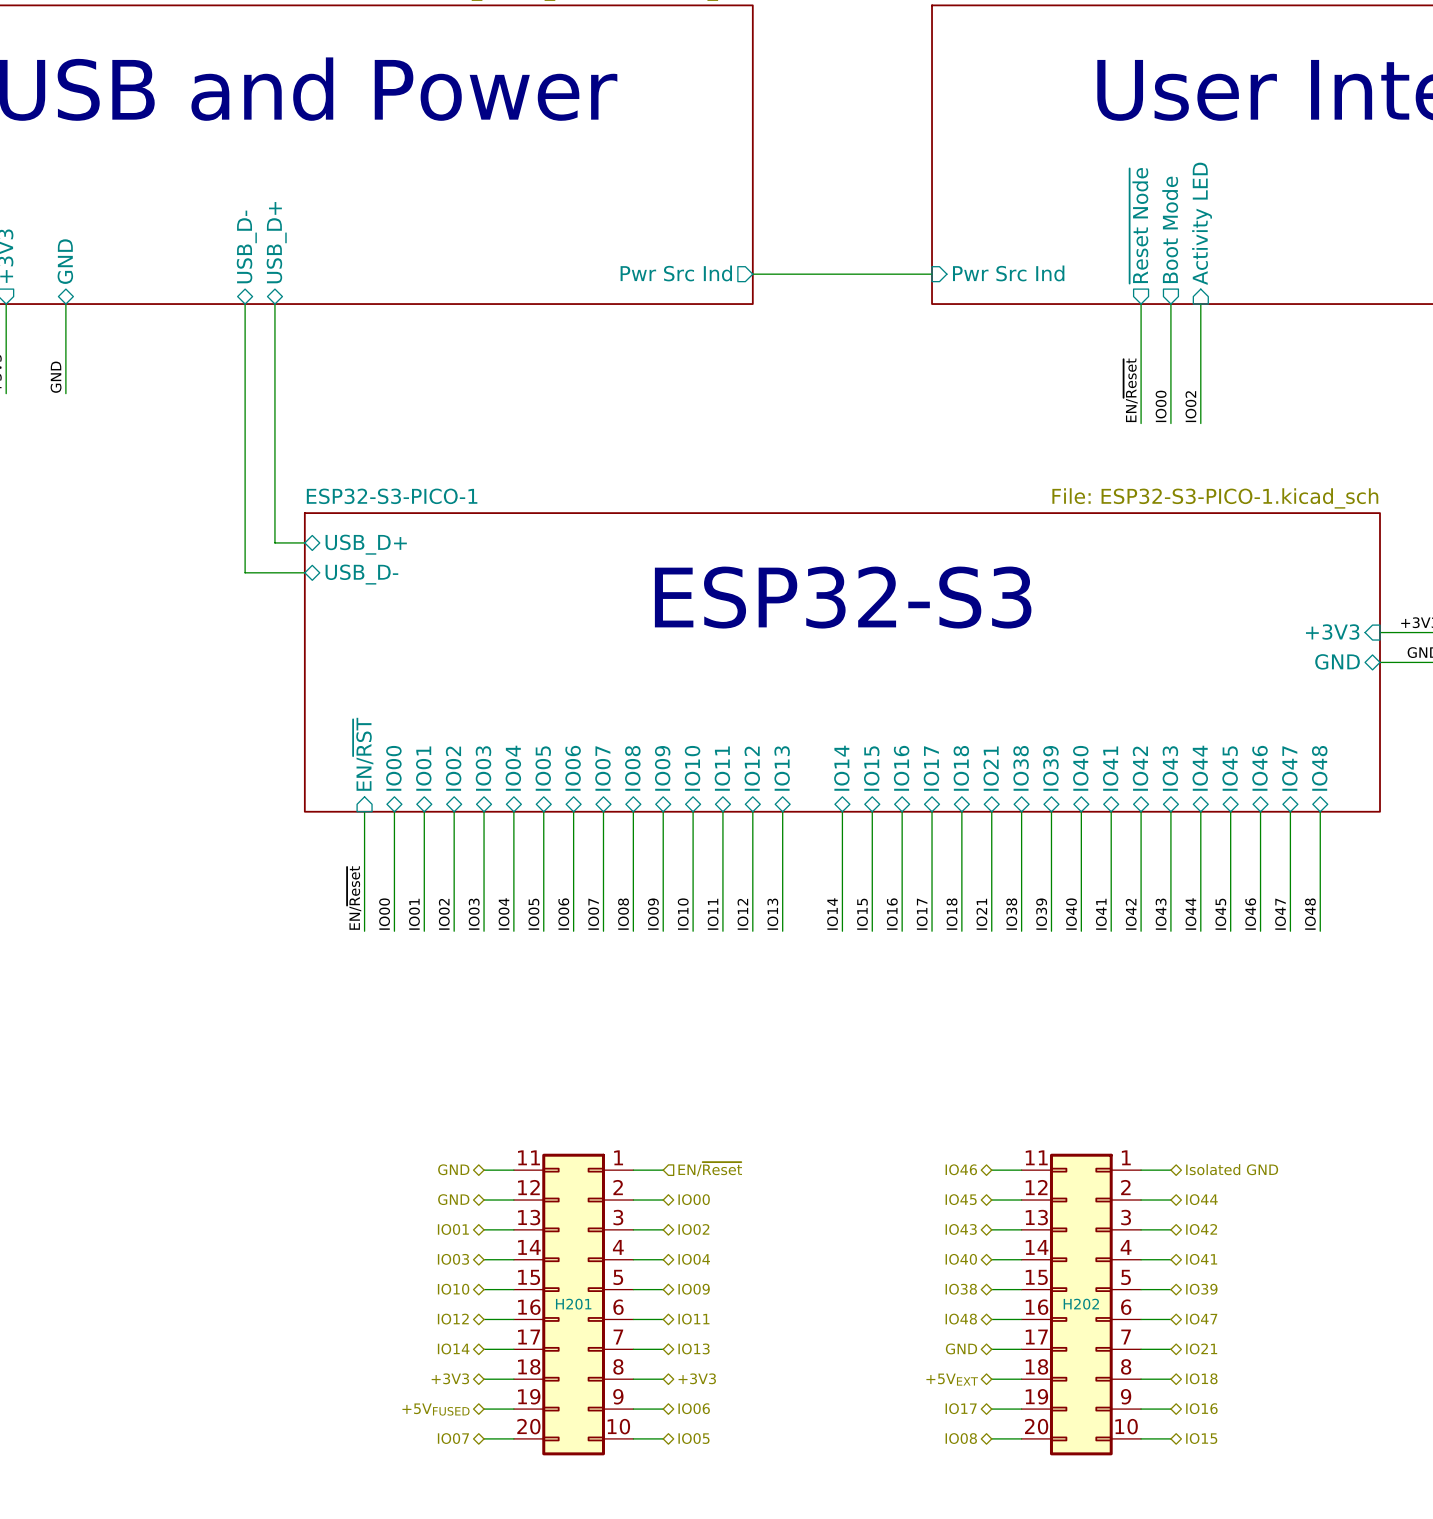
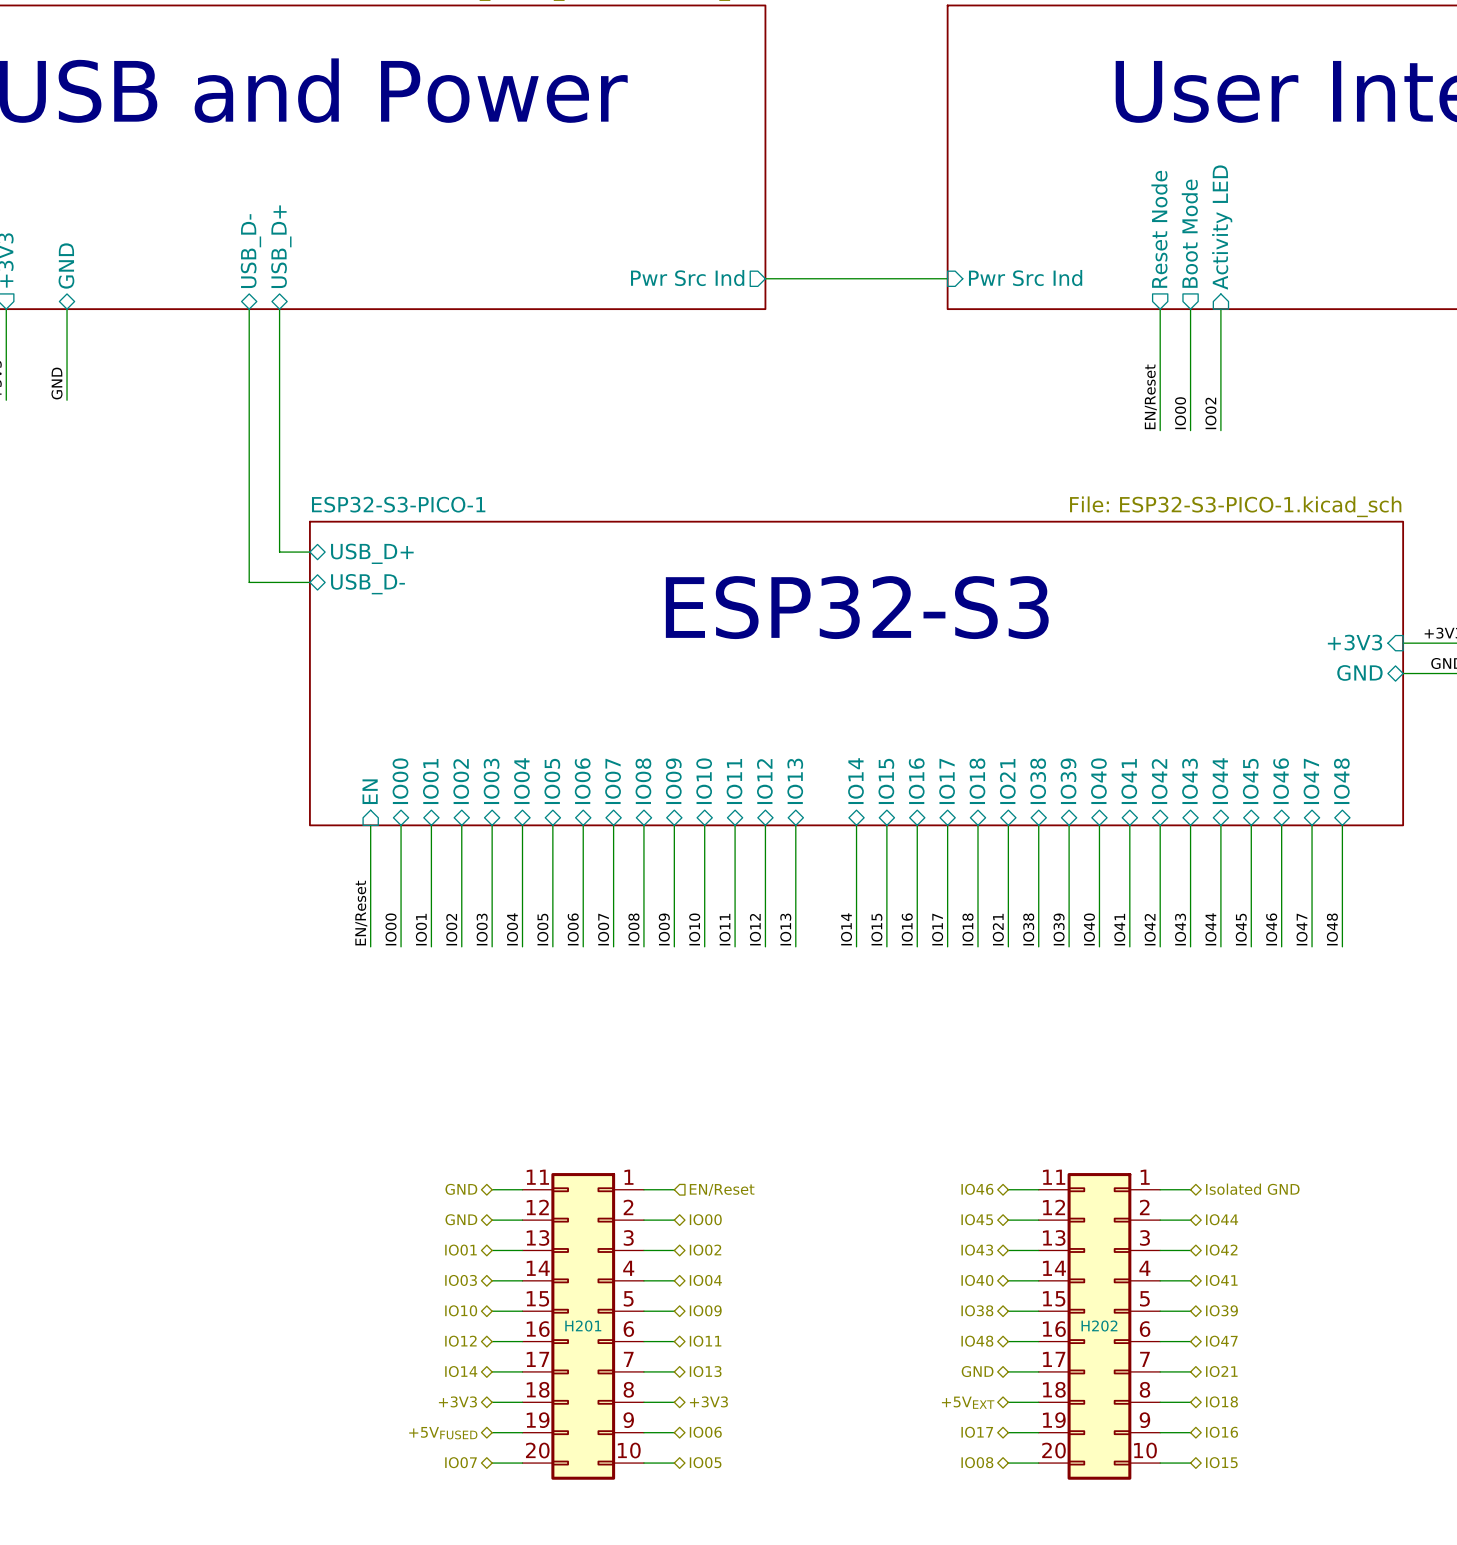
sheet pin: ~{Reset Node} (1138, 225) -> Reset Node (1159, 229)
label: EN/~{Reset} (1130, 390) -> EN/Reset (1150, 396)
sheet pin: EN/~{RST} (363, 754) -> EN (370, 791)
label: EN/~{Reset} (354, 898) -> EN/Reset (361, 913)
hierarchical label: EN/~{Reset} (710, 1169) -> EN/Reset (722, 1190)

